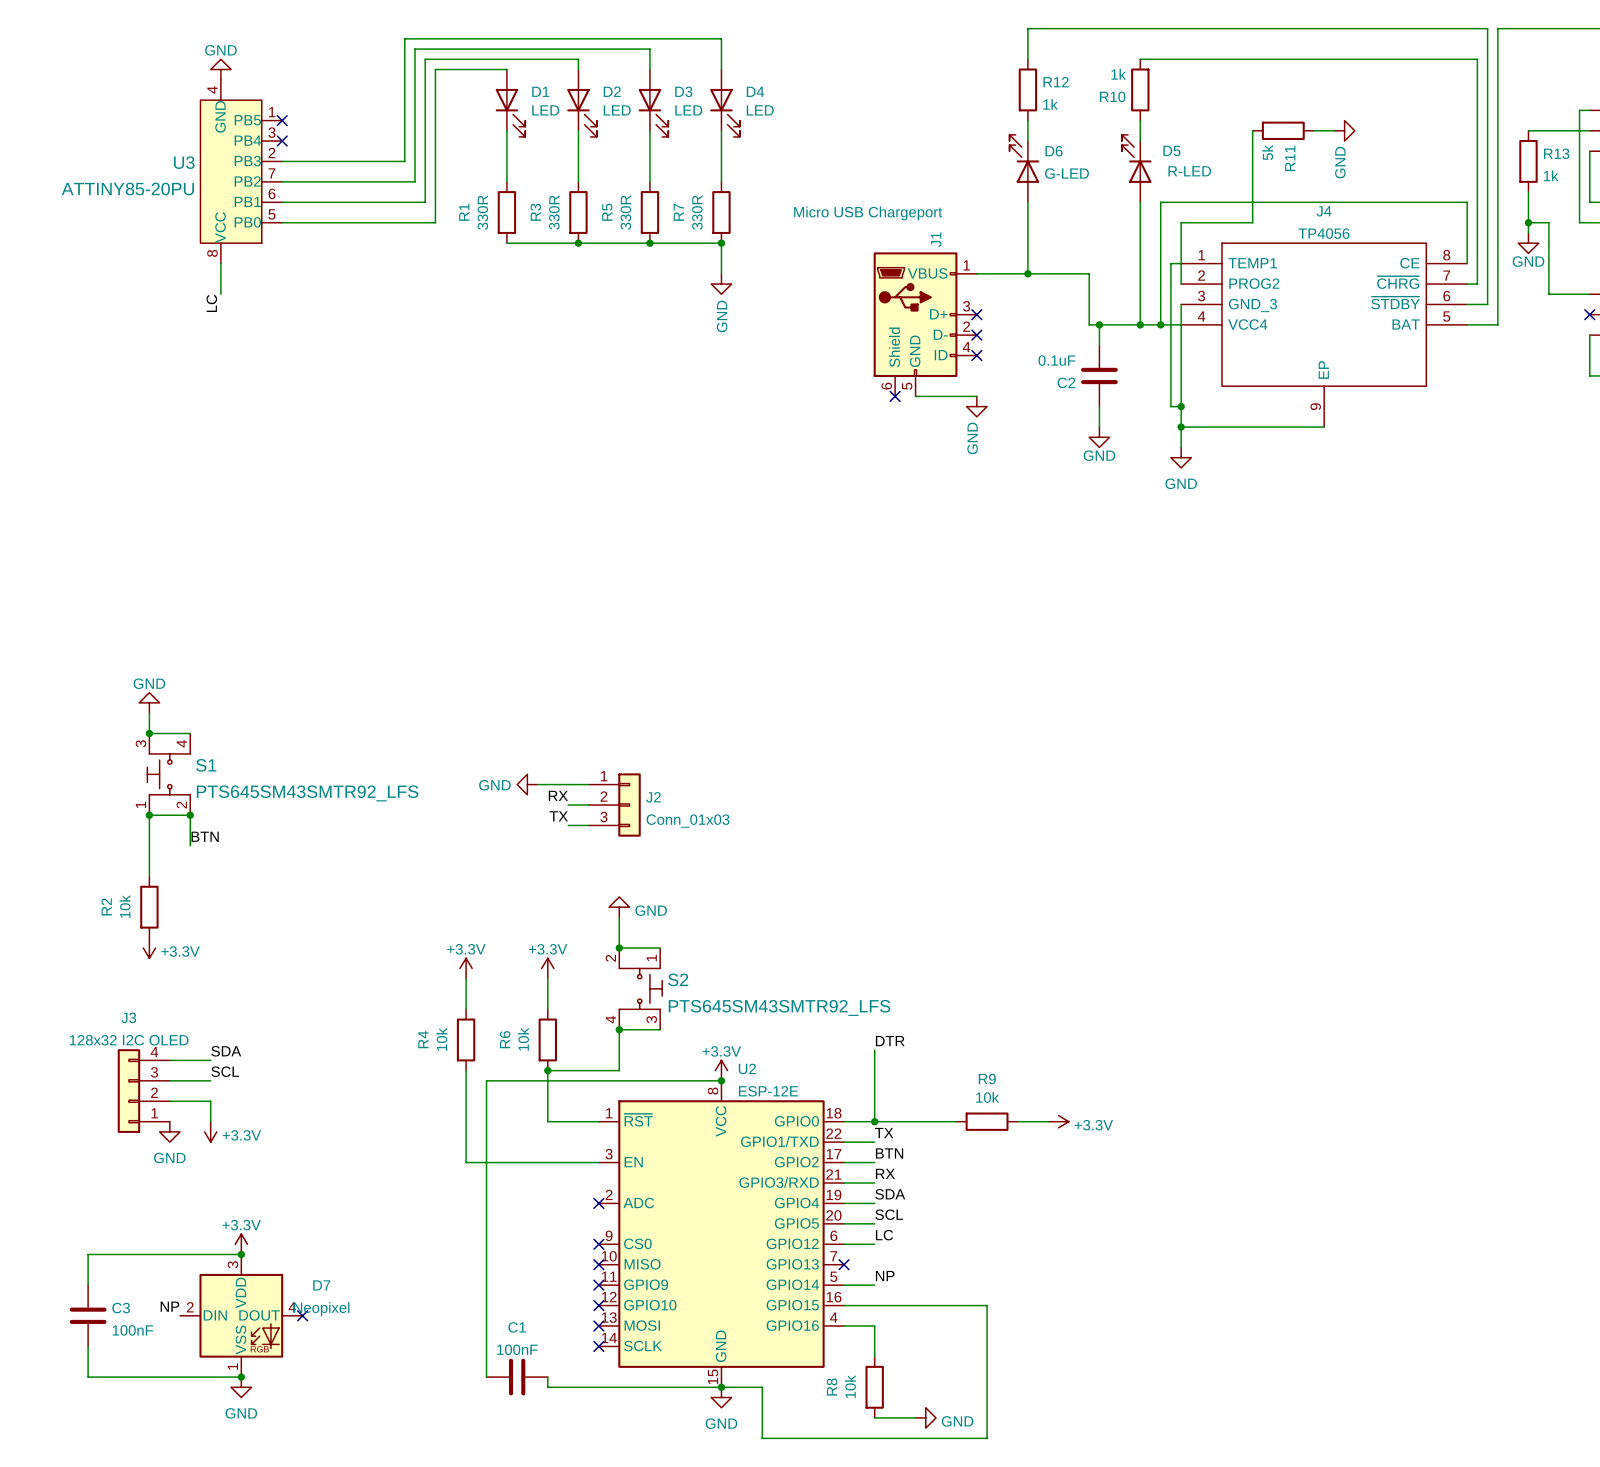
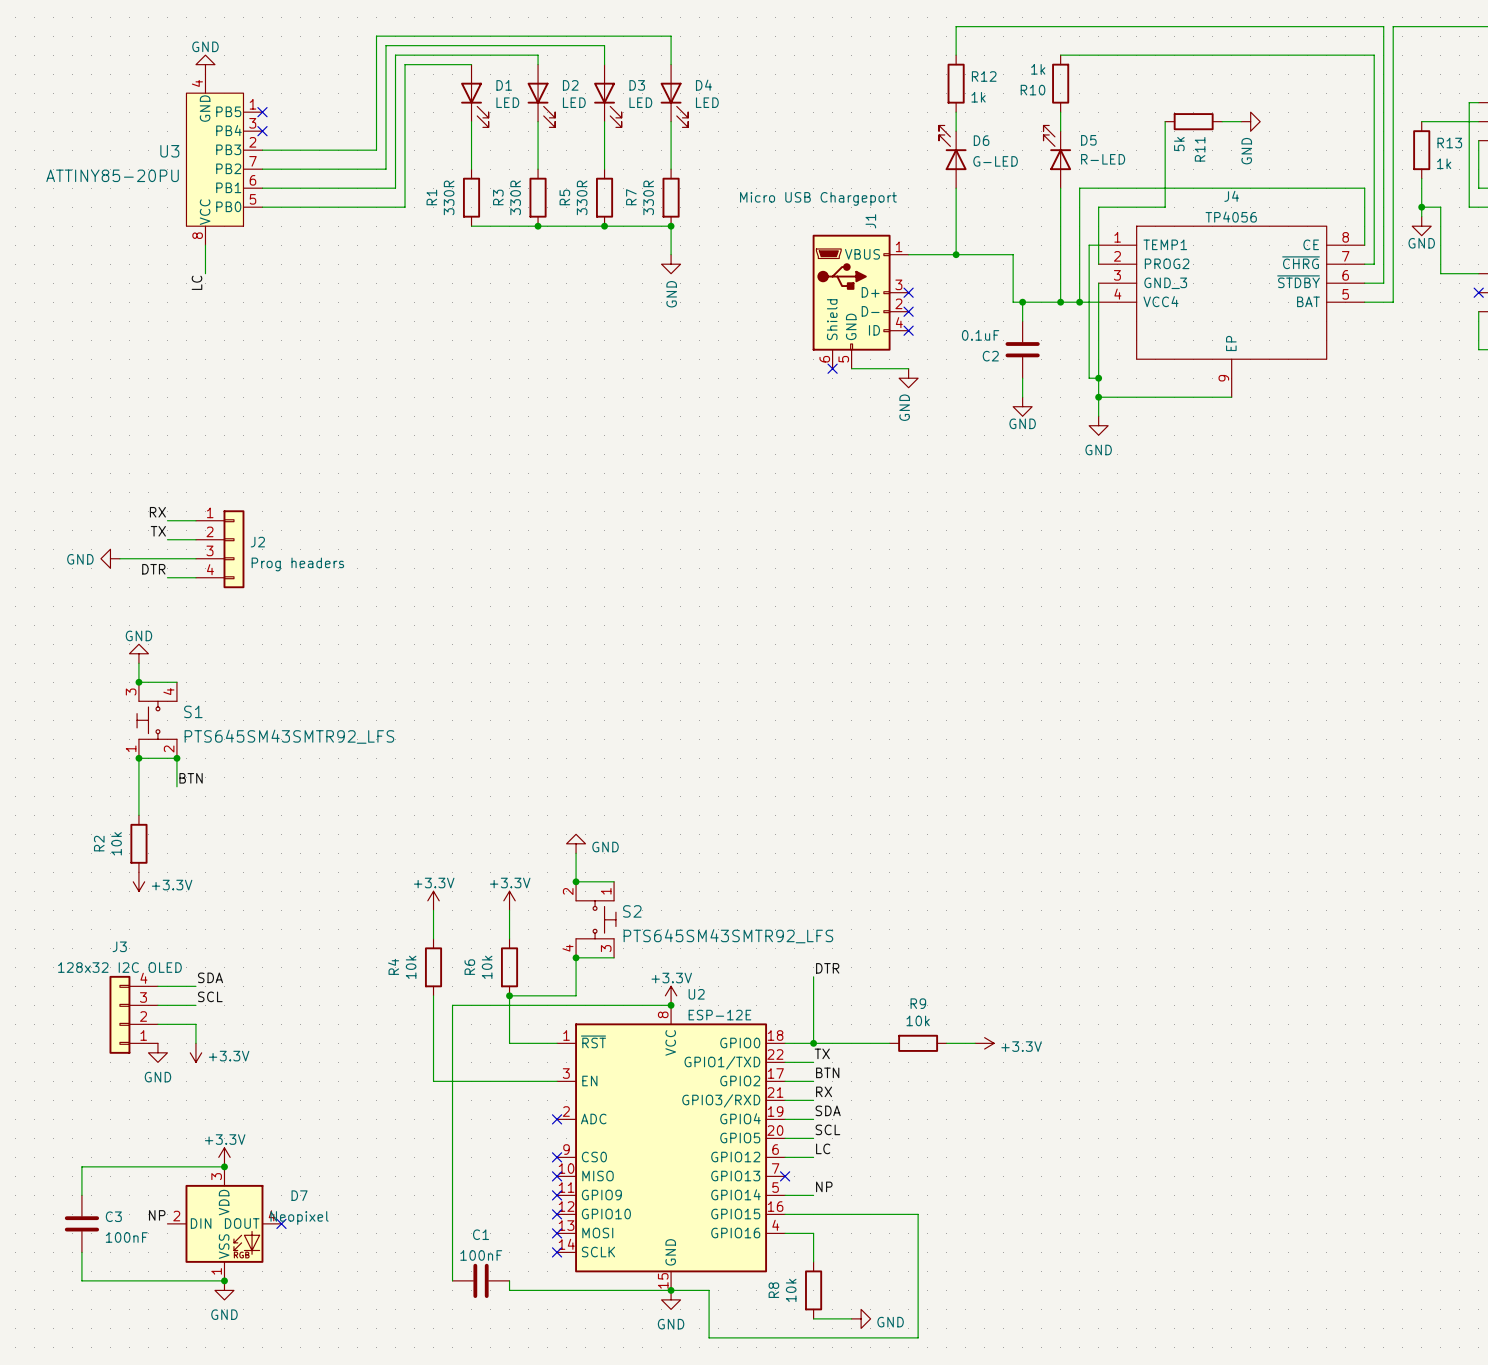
label: none -> RX (157, 512)
wire: none -> (167, 520) (195, 520)
label: none -> TX (158, 531)
wire: none -> (167, 539) (195, 539)
power symbol: none -> GND (110, 558)
wire: none -> (119, 558) (195, 558)
label: none -> DTR (153, 569)
wire: none -> (167, 577) (195, 577)
J2 symbol: [588, 773, 641, 837] -> [195, 510, 245, 589]
power symbol: GND (527, 784) -> none
wire: (537, 784) (588, 784) -> none
label: RX (558, 795) -> none
wire: (568, 805) (588, 805) -> none
label: TX (558, 816) -> none
J2 value: Conn_01x03 (688, 821) -> Prog headers (297, 564)
wire: (568, 825) (588, 825) -> none

